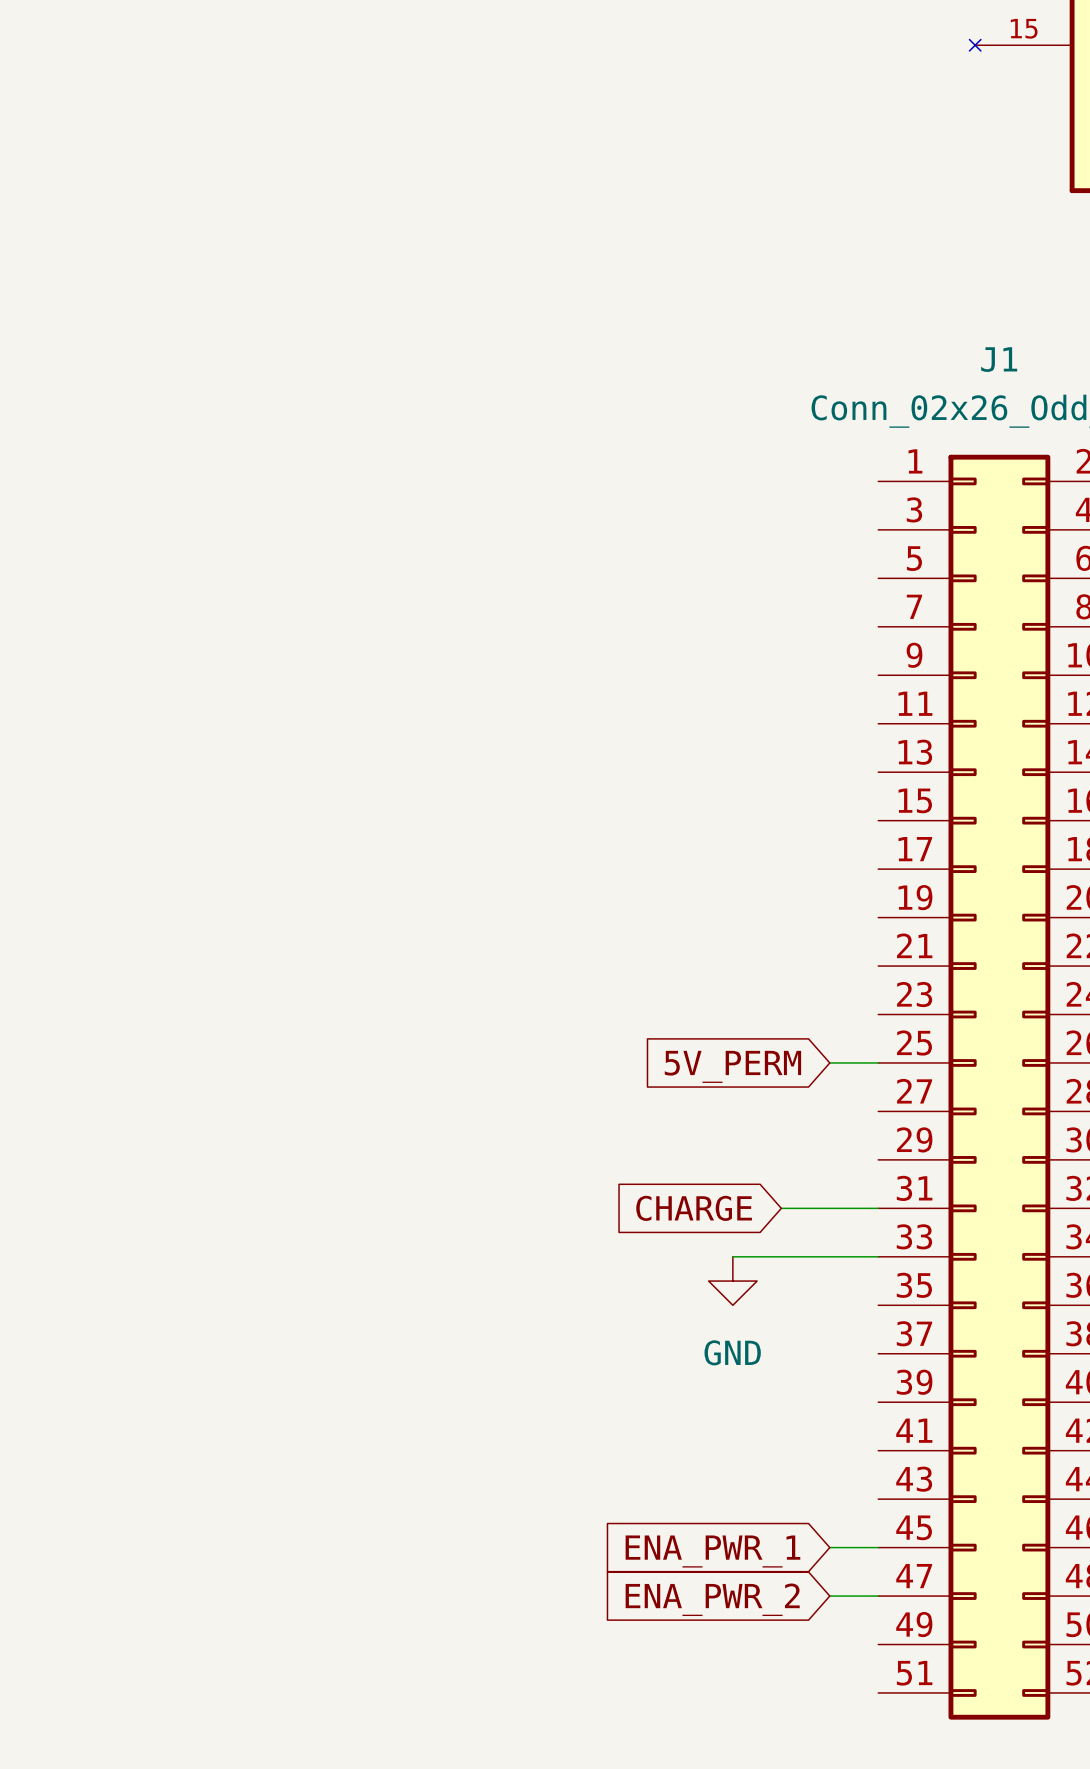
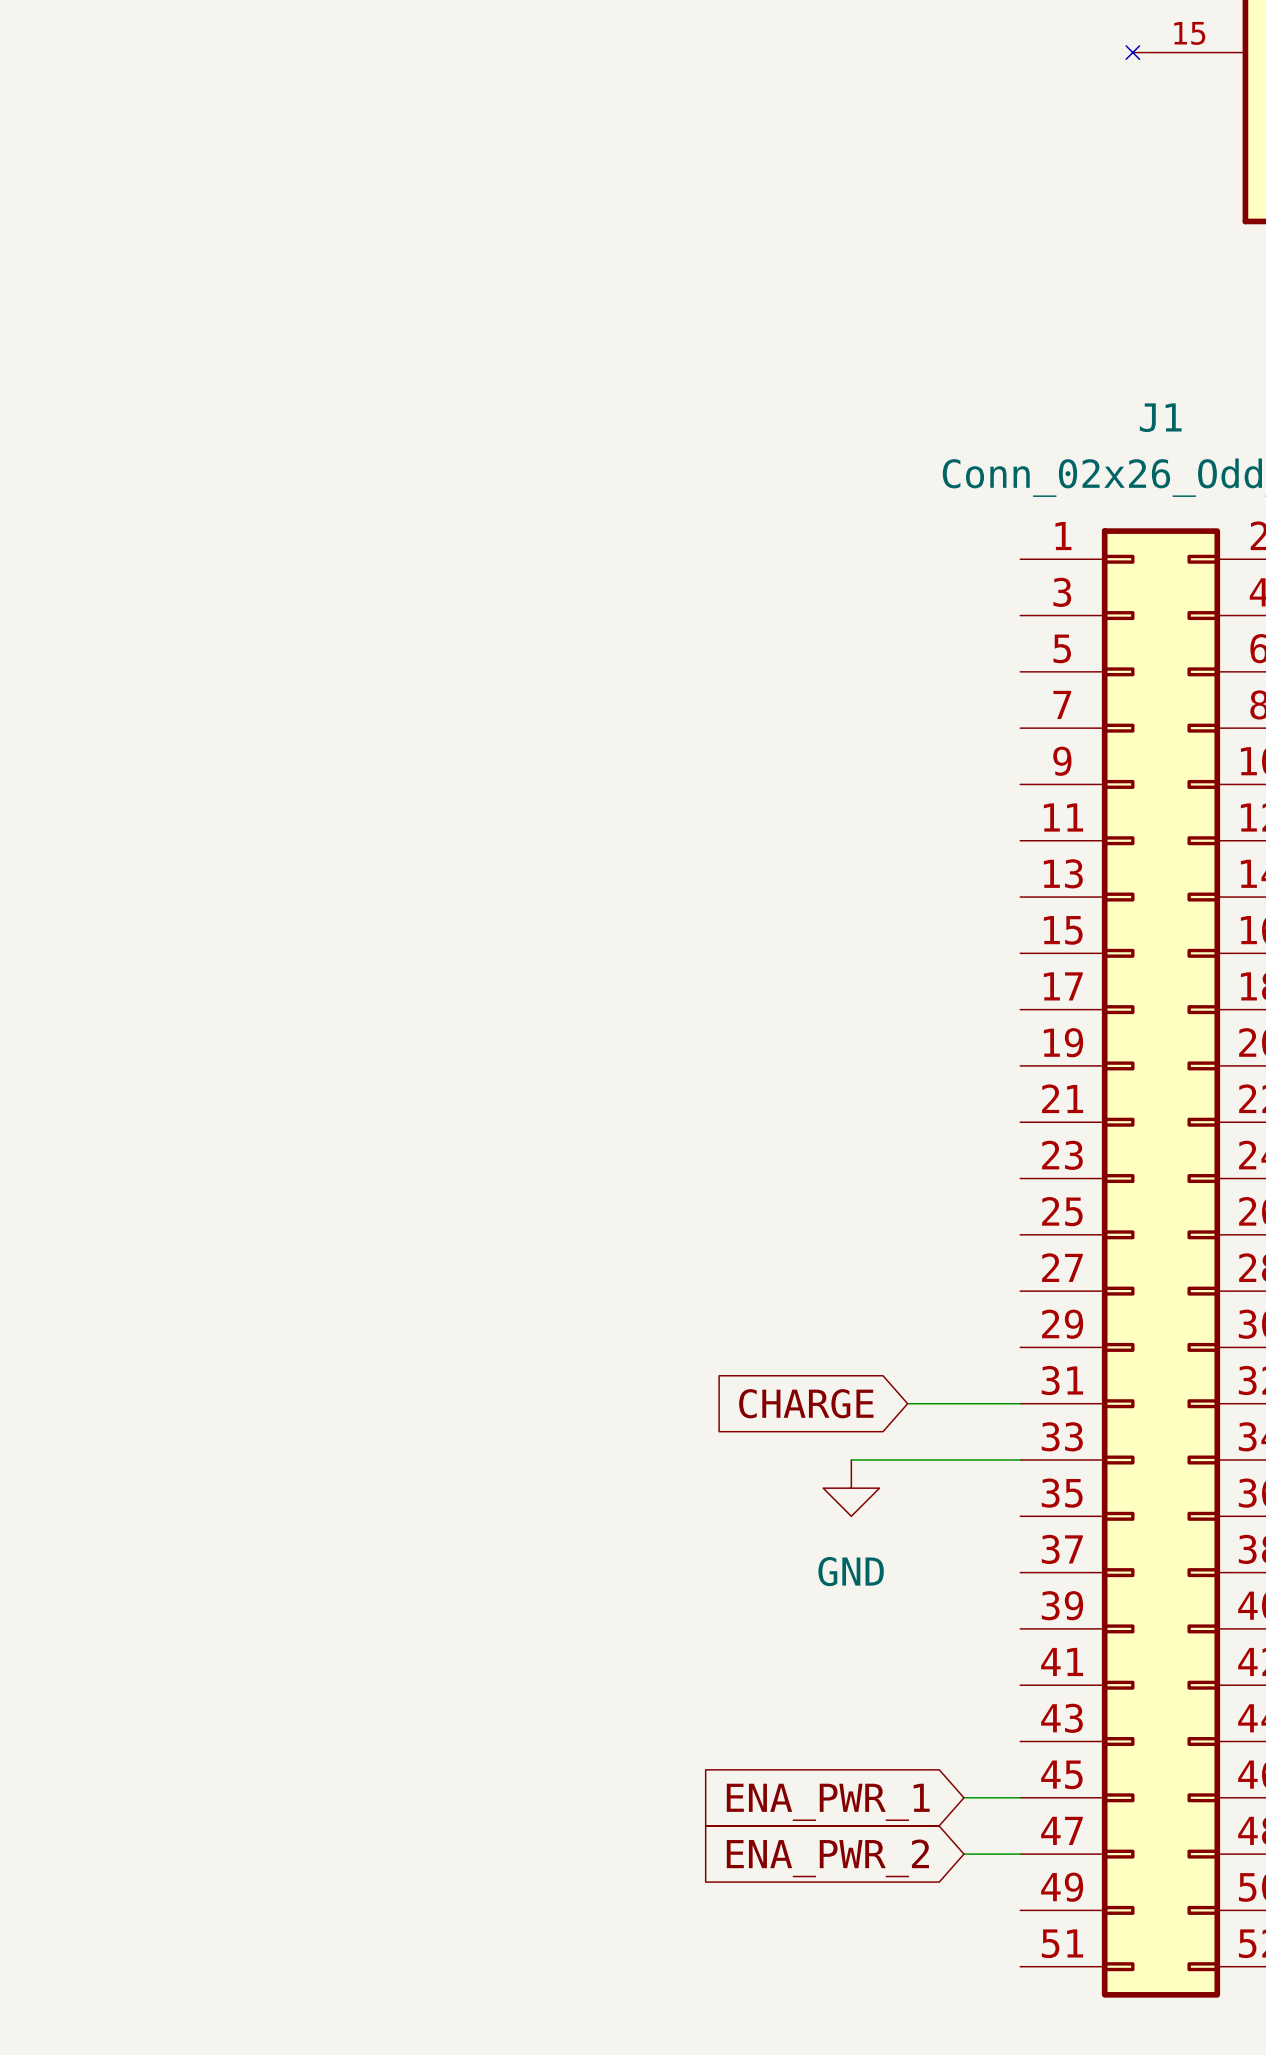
wire: (829, 1062) (878, 1062) -> none
global label: 5V_PERM (732, 1066) -> none

